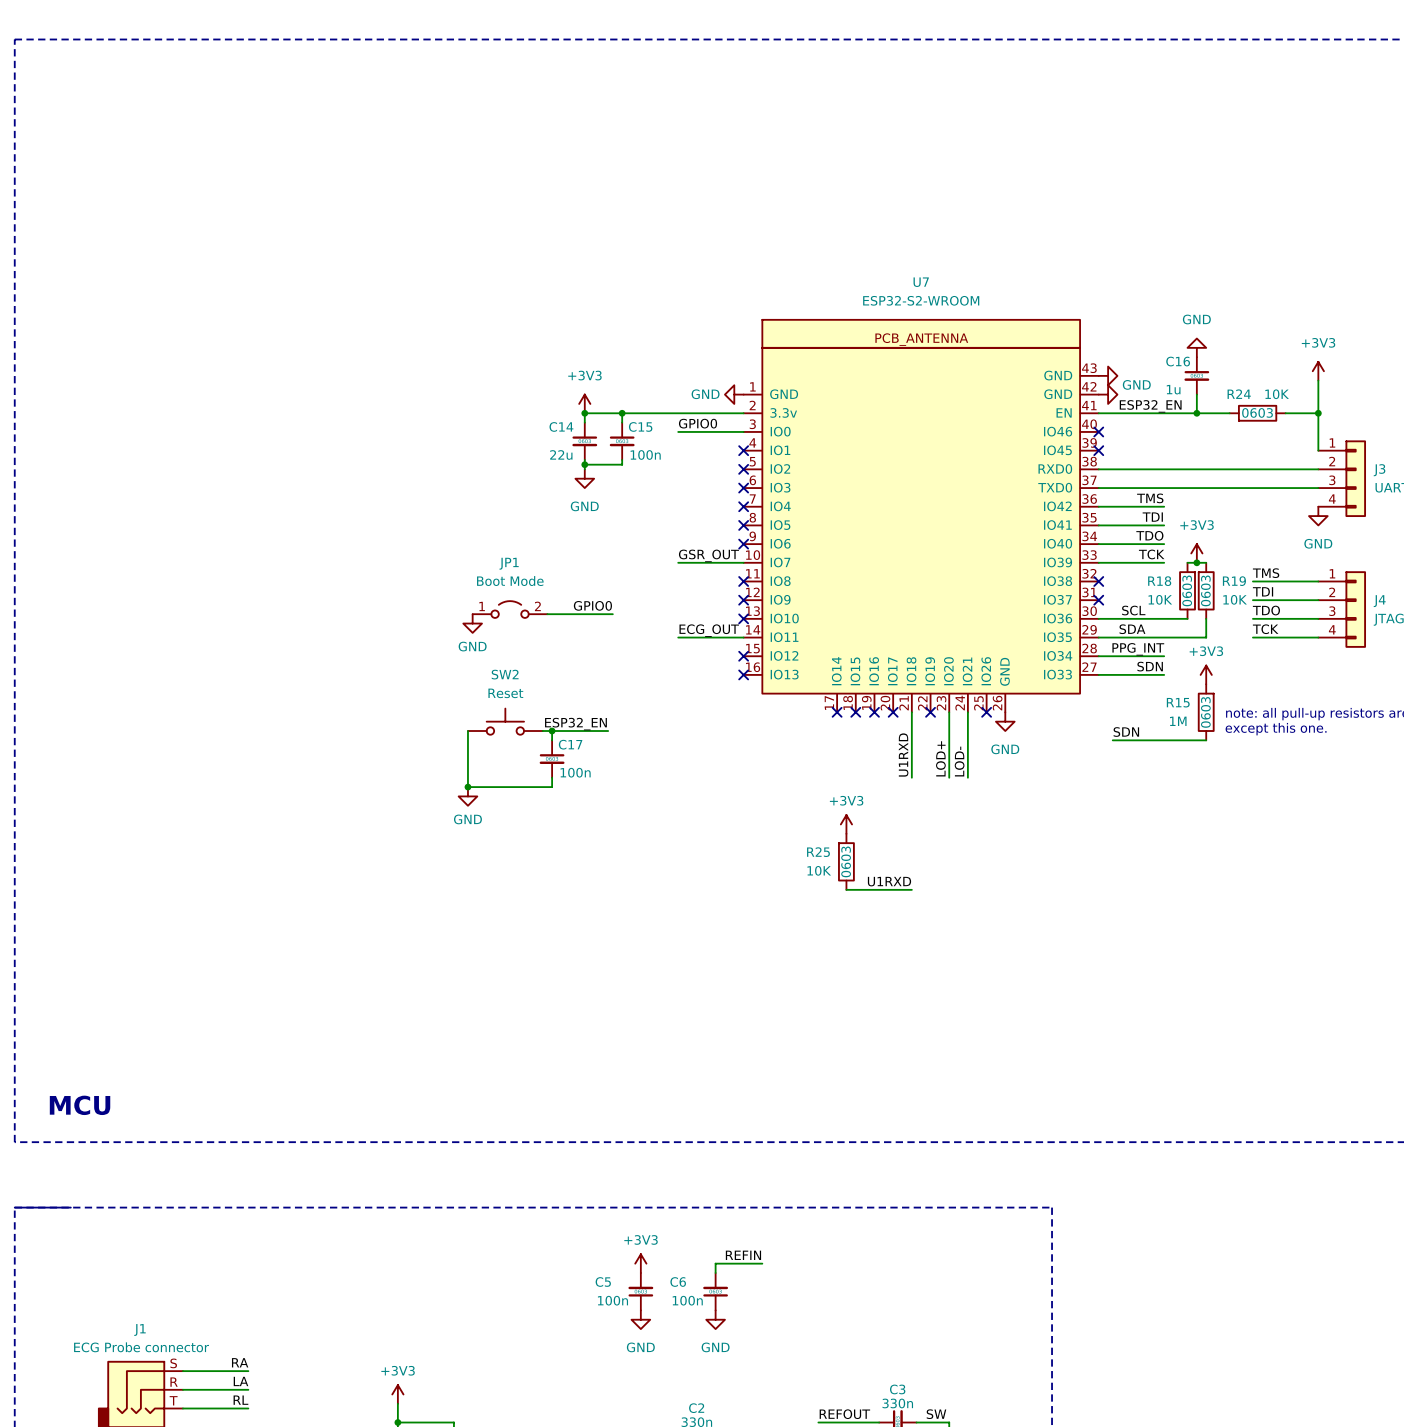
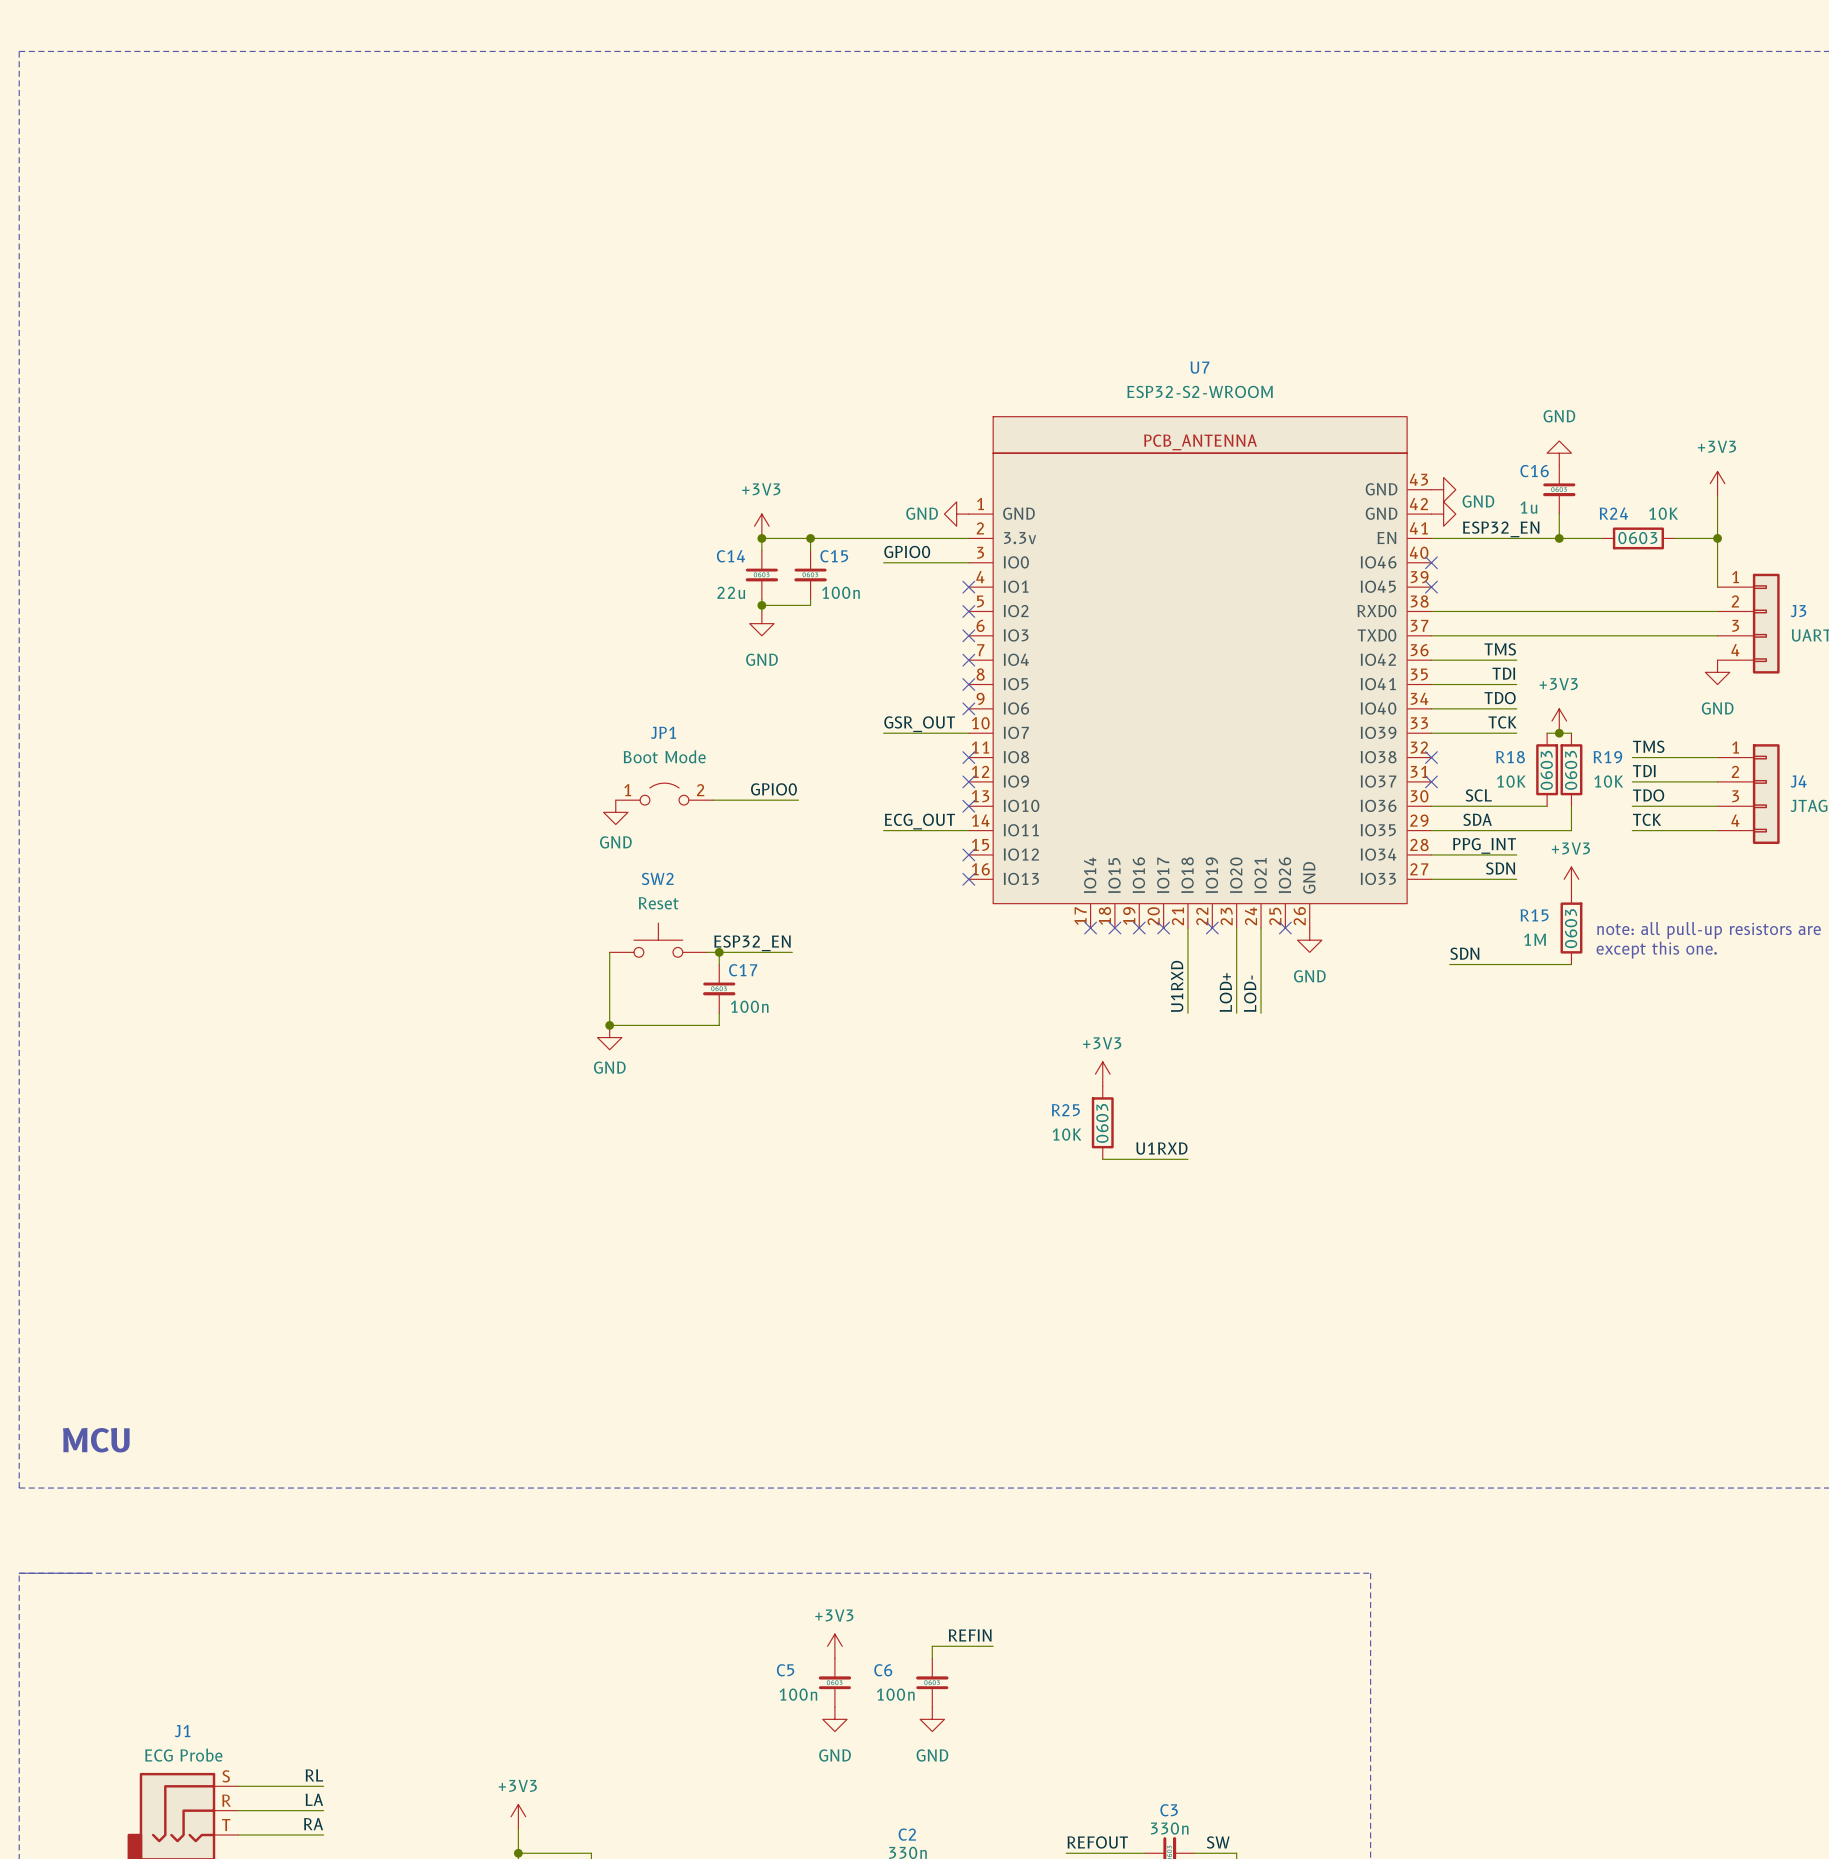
J1 value: ECG Probe connector (141, 1347) -> ECG Probe (183, 1755)
label: RA (240, 1362) -> RL (314, 1775)
label: RL (240, 1400) -> RA (313, 1824)

